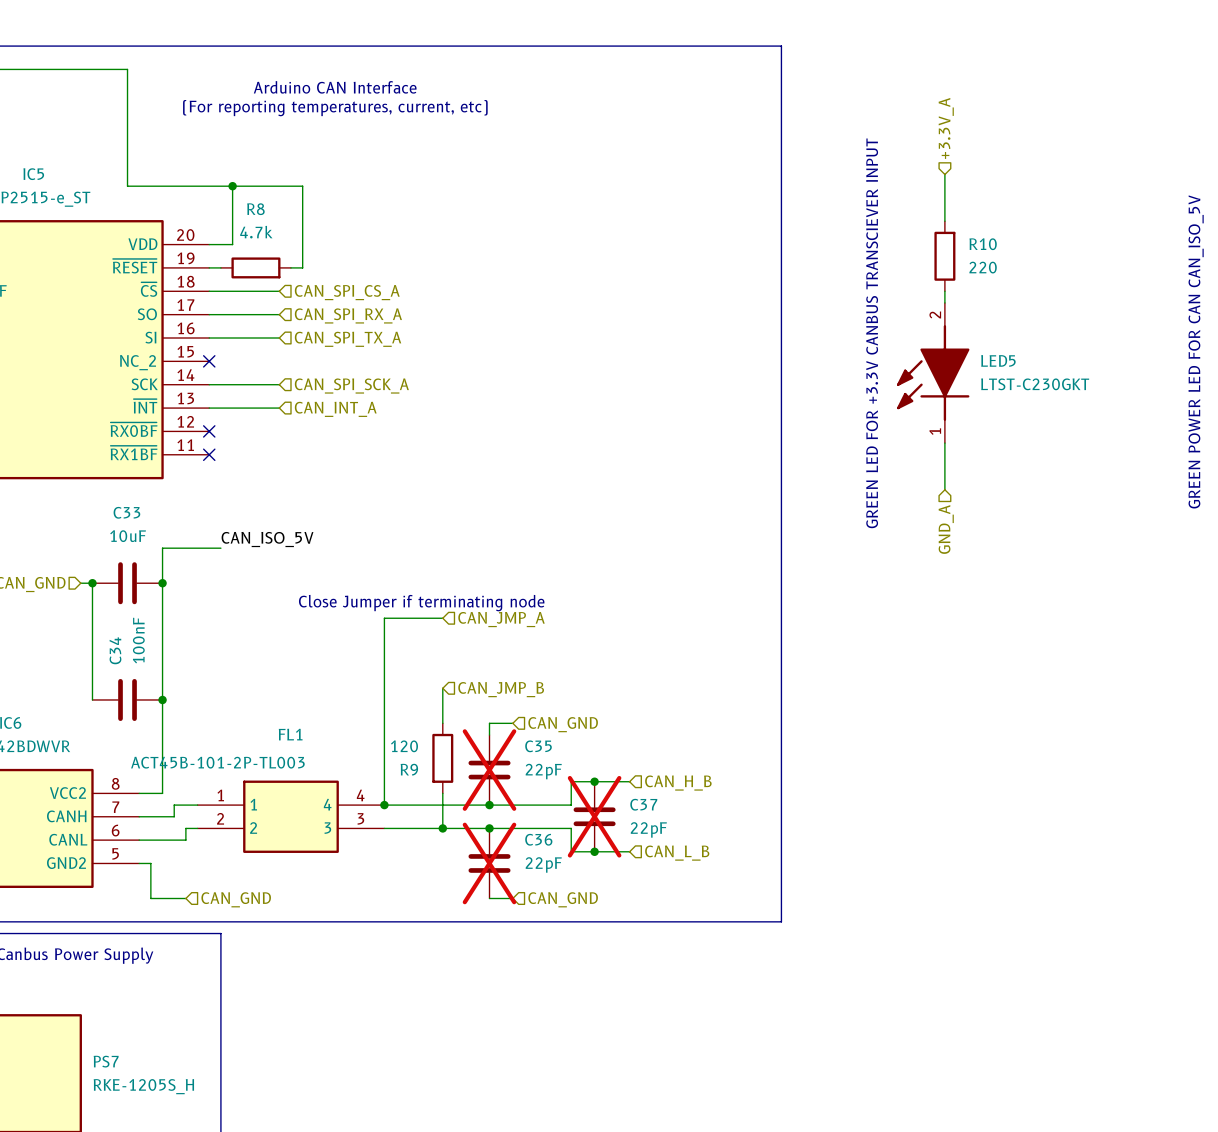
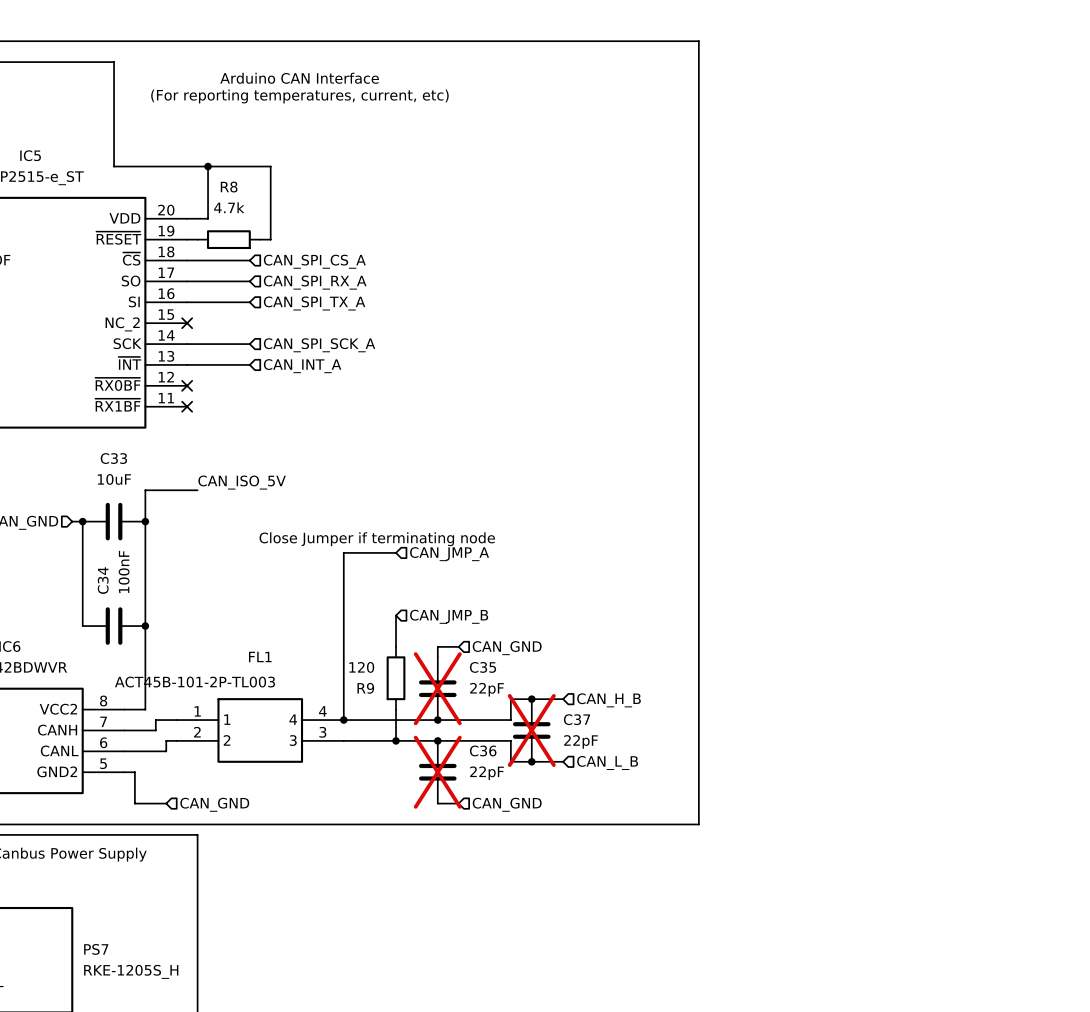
hierarchical label: +3.3V_A (946, 128) -> none
wire: (944, 174) (944, 221) -> none
R10: 220 (944, 256) -> none
wire: (944, 291) (944, 302) -> none
text: GREEN LED FOR +3.3V CANBUS TRANSCIEVER INPUT (872, 333) -> none
text: GREEN POWER LED FOR CAN CAN_ISO_5V (1196, 351) -> none
LED5: LTST-C230GKT (933, 373) -> none
wire: (944, 443) (944, 489) -> none
hierarchical label: GND_A (946, 529) -> none

